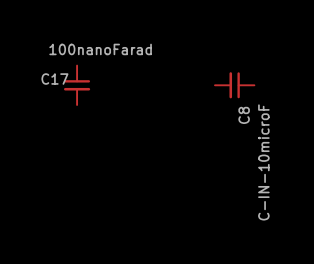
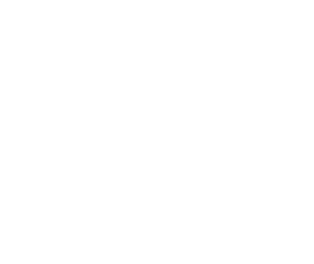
C17: 100nanoFarad (77, 85) -> none
C8: C-IN-10microF (234, 85) -> none

